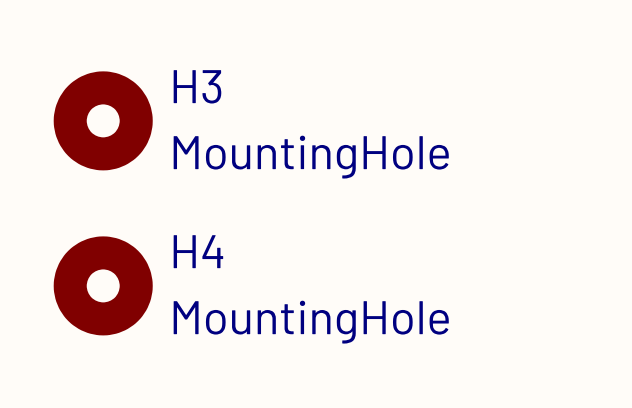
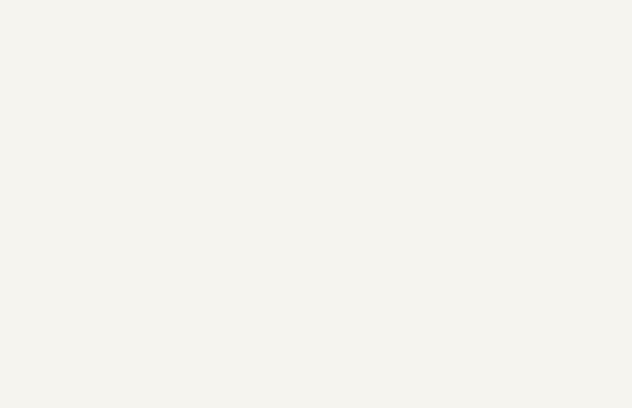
H3: MountingHole (103, 120) -> none
H4: MountingHole (103, 285) -> none

